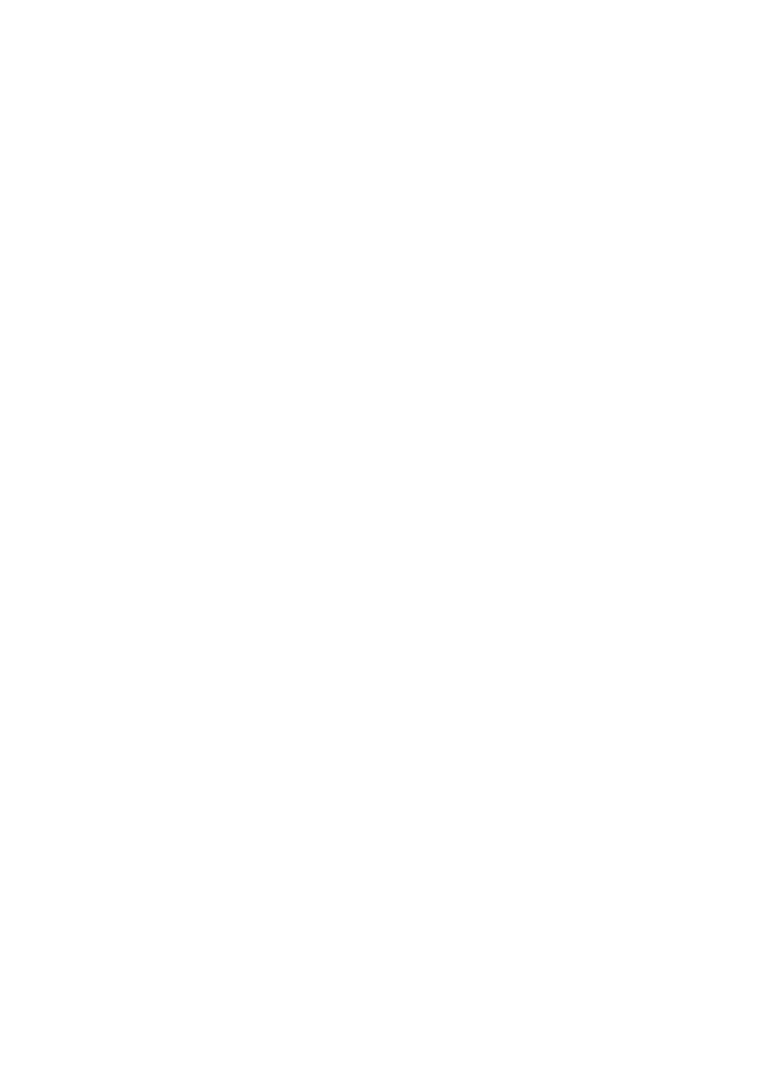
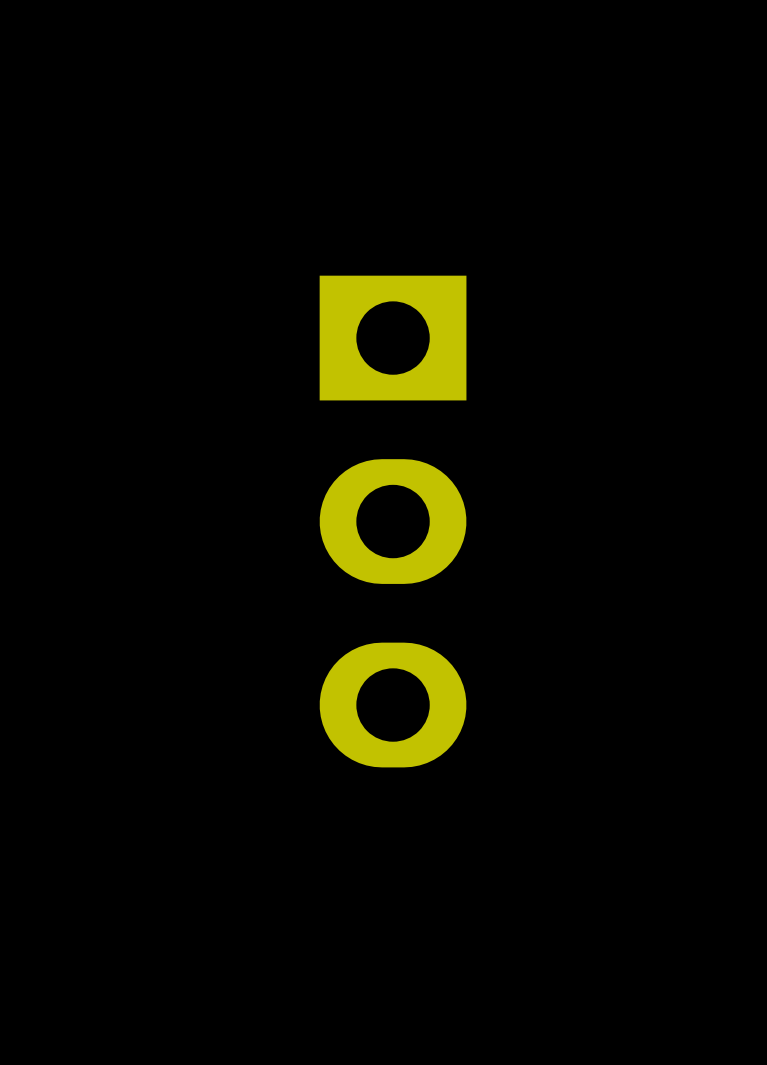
part: none -> (393, 521)

